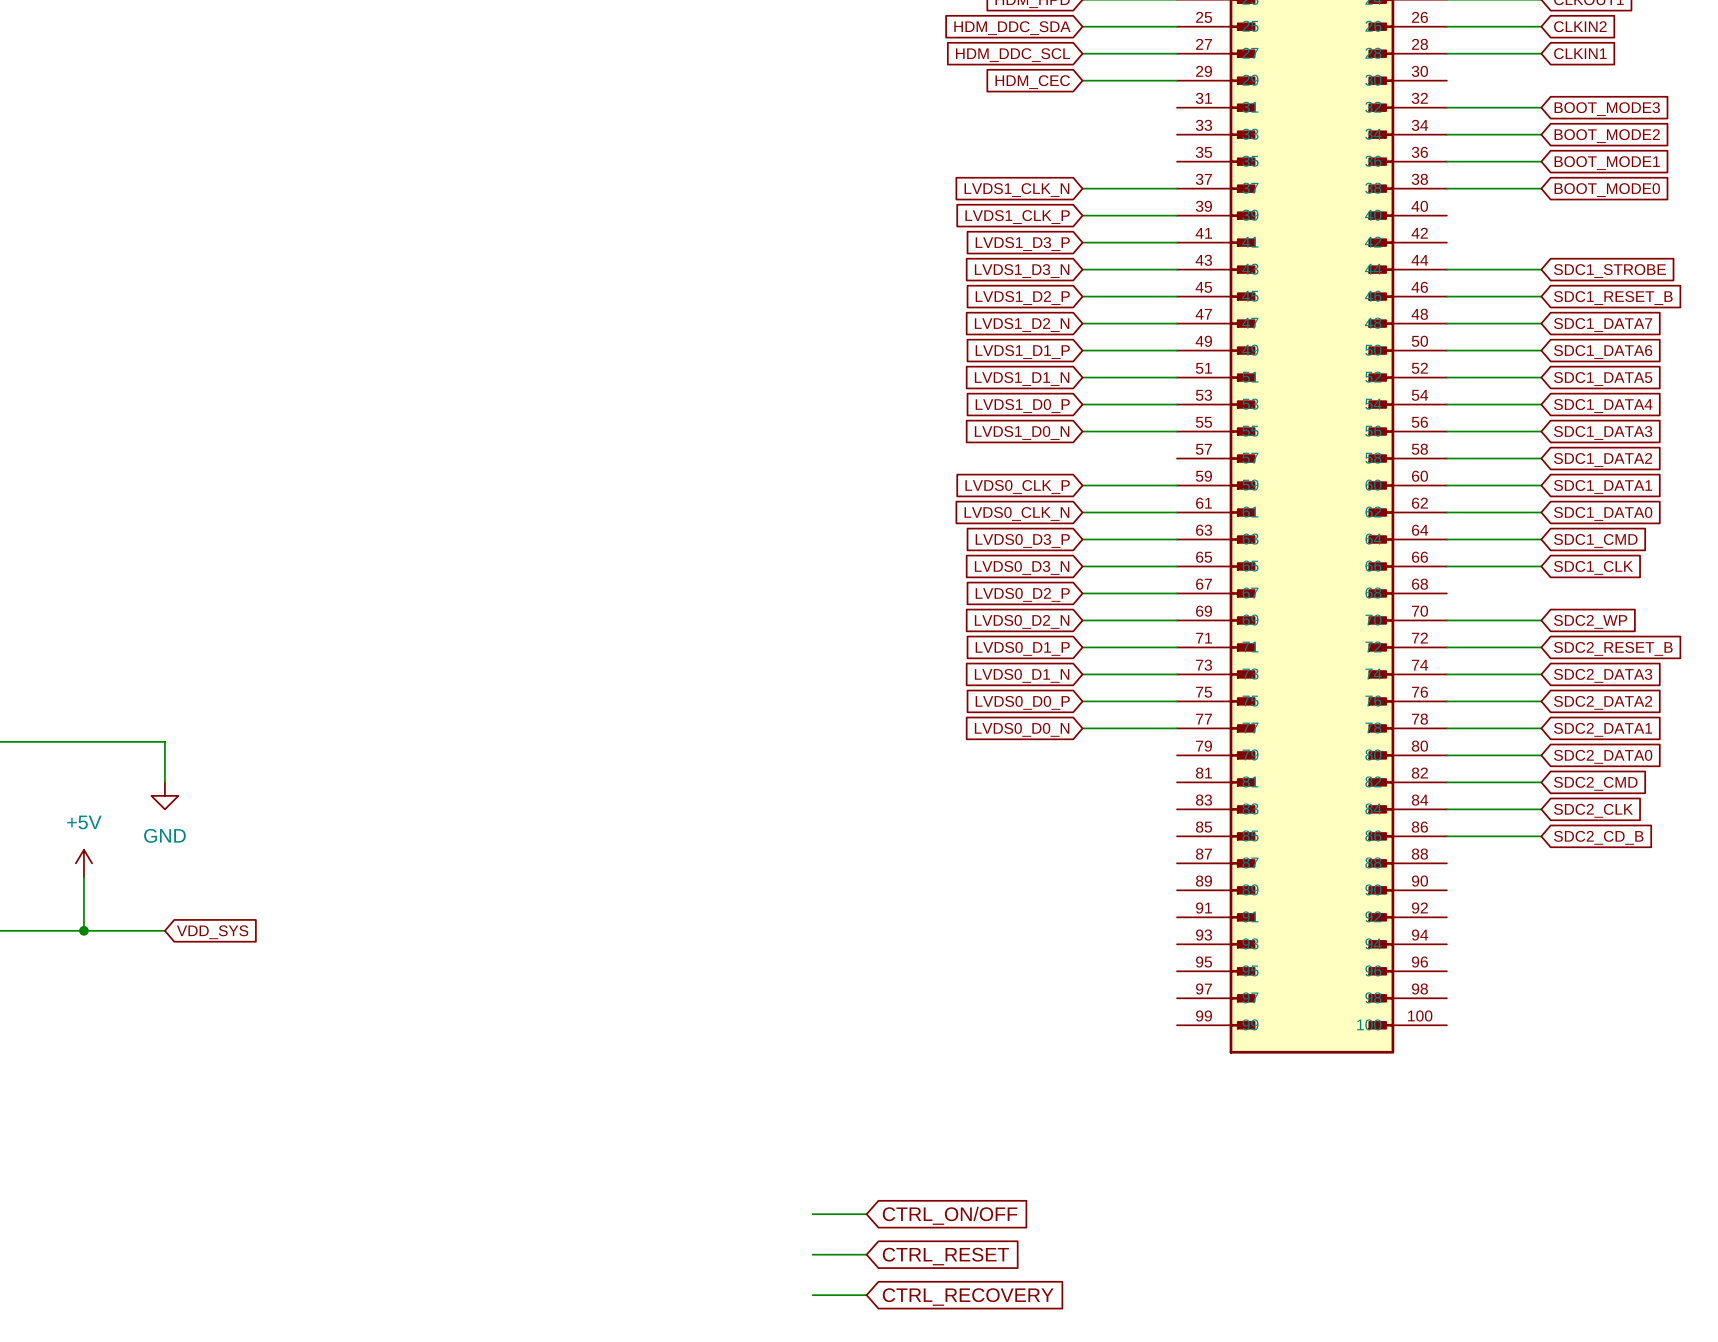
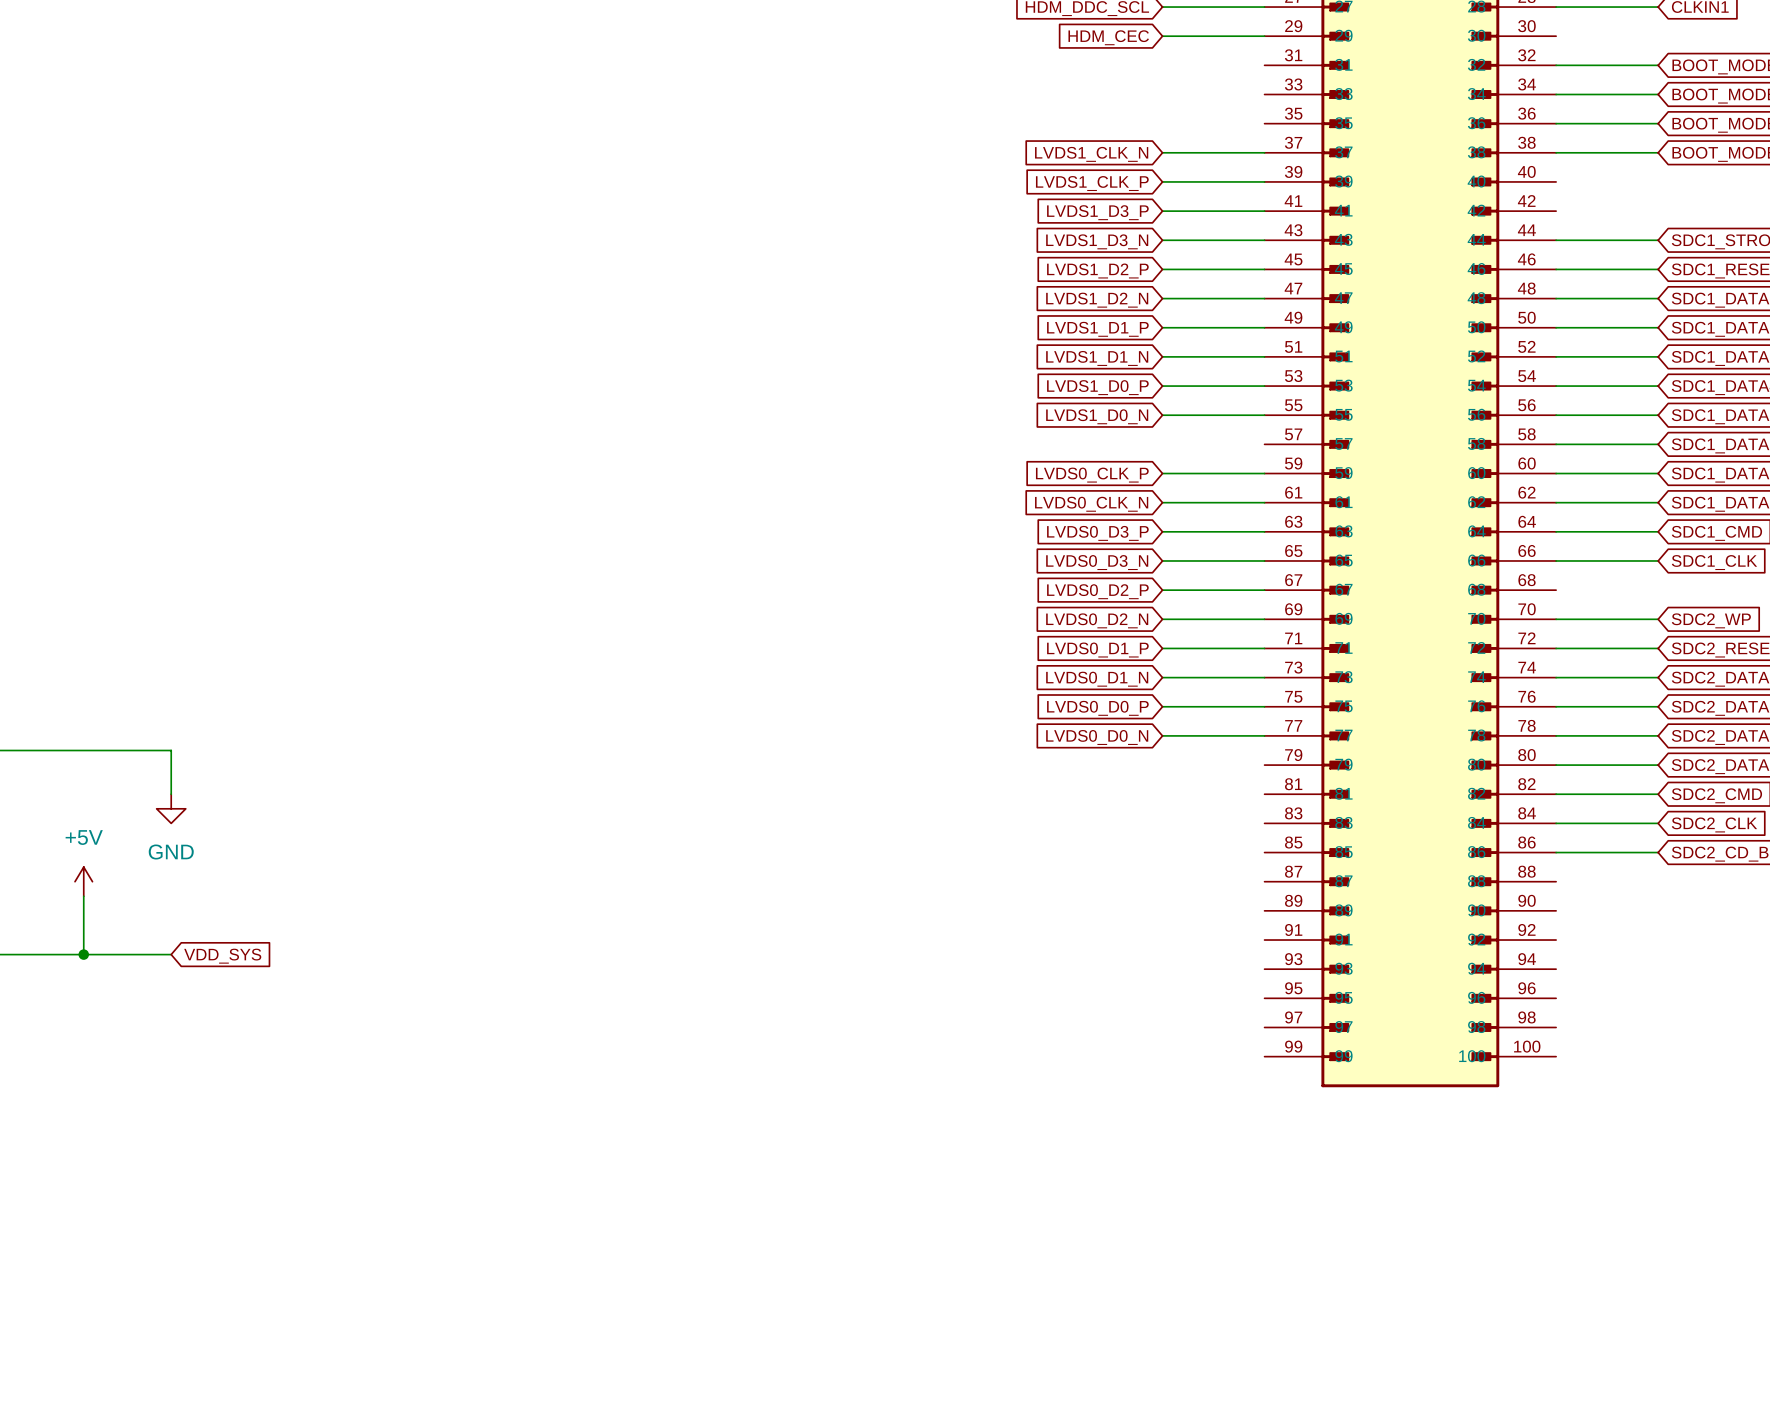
wire: (812, 1214) (866, 1214) -> none
global label: CTRL_ON/OFF (950, 1215) -> none
wire: (812, 1254) (866, 1254) -> none
global label: CTRL_RESET (945, 1256) -> none
wire: (812, 1295) (866, 1295) -> none
global label: CTRL_RECOVERY (968, 1297) -> none

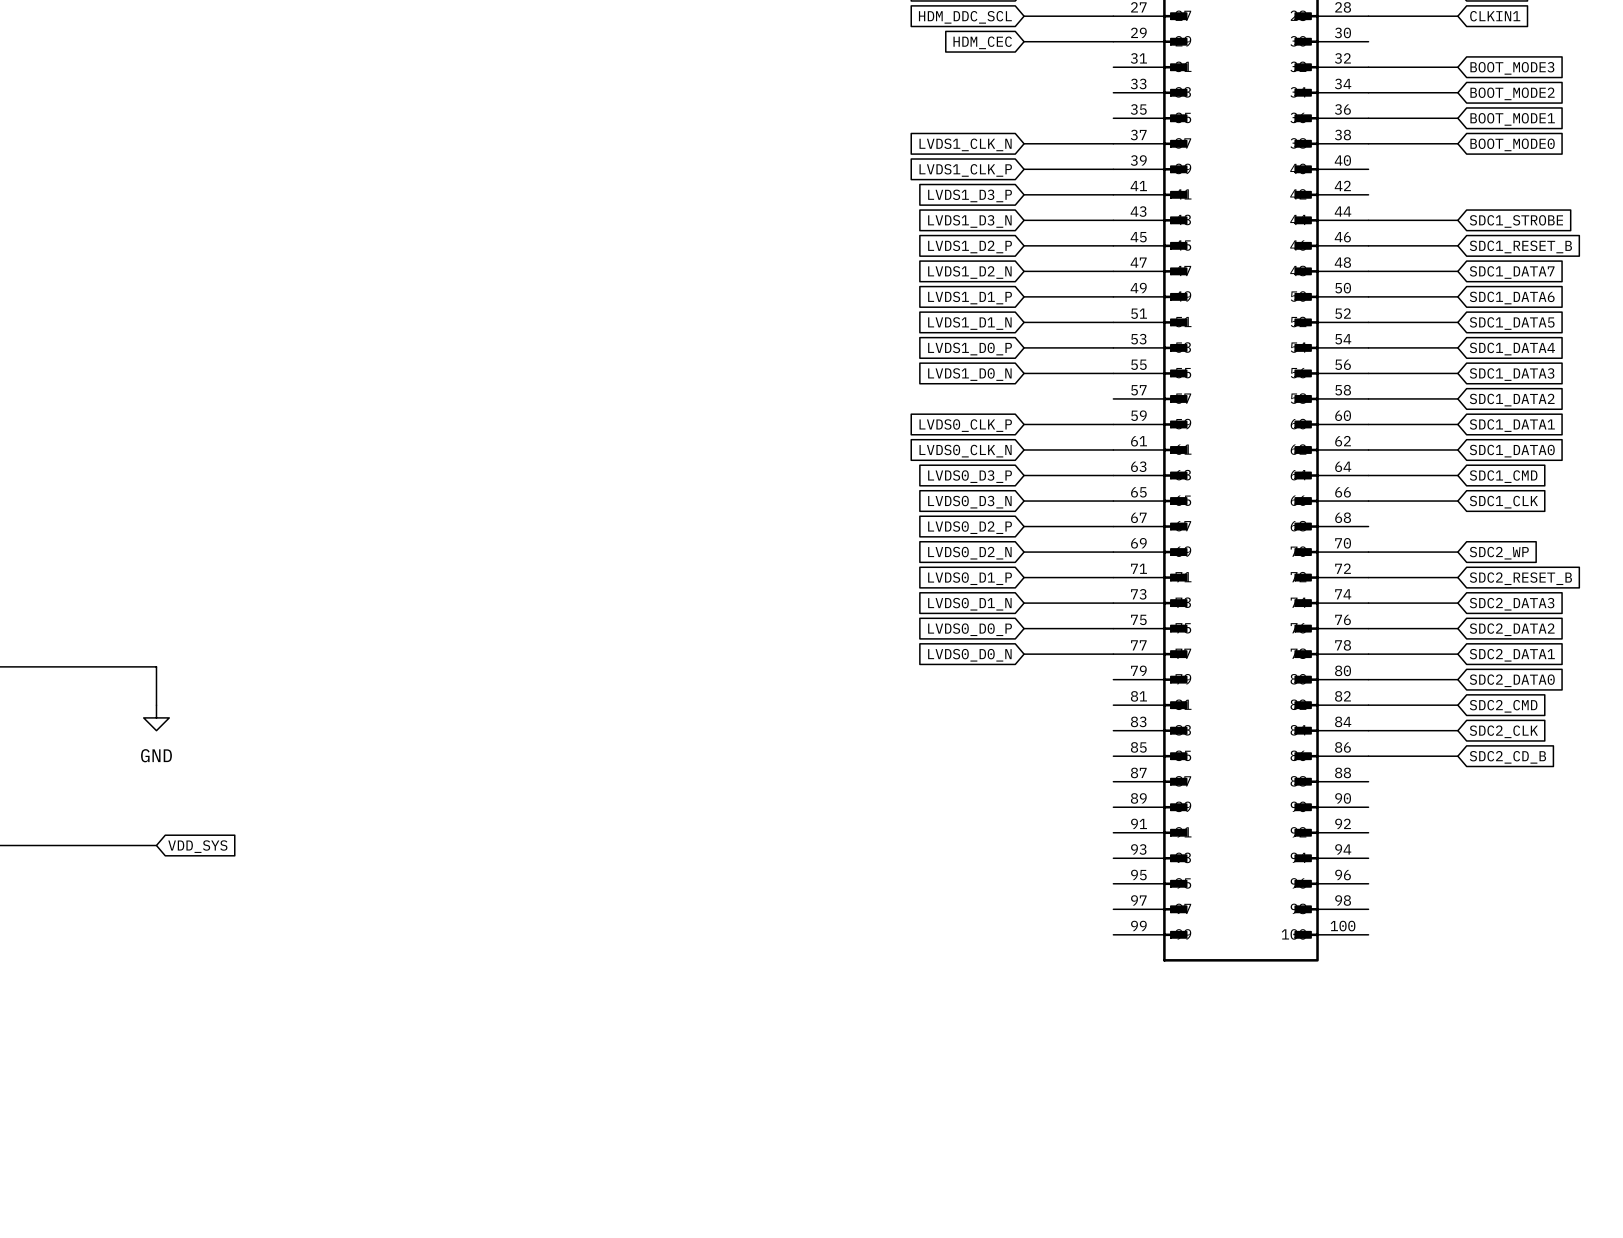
power symbol: +5V (83, 881) -> none
wire: (83, 896) (83, 954) -> none
junction: (83, 954) -> none

